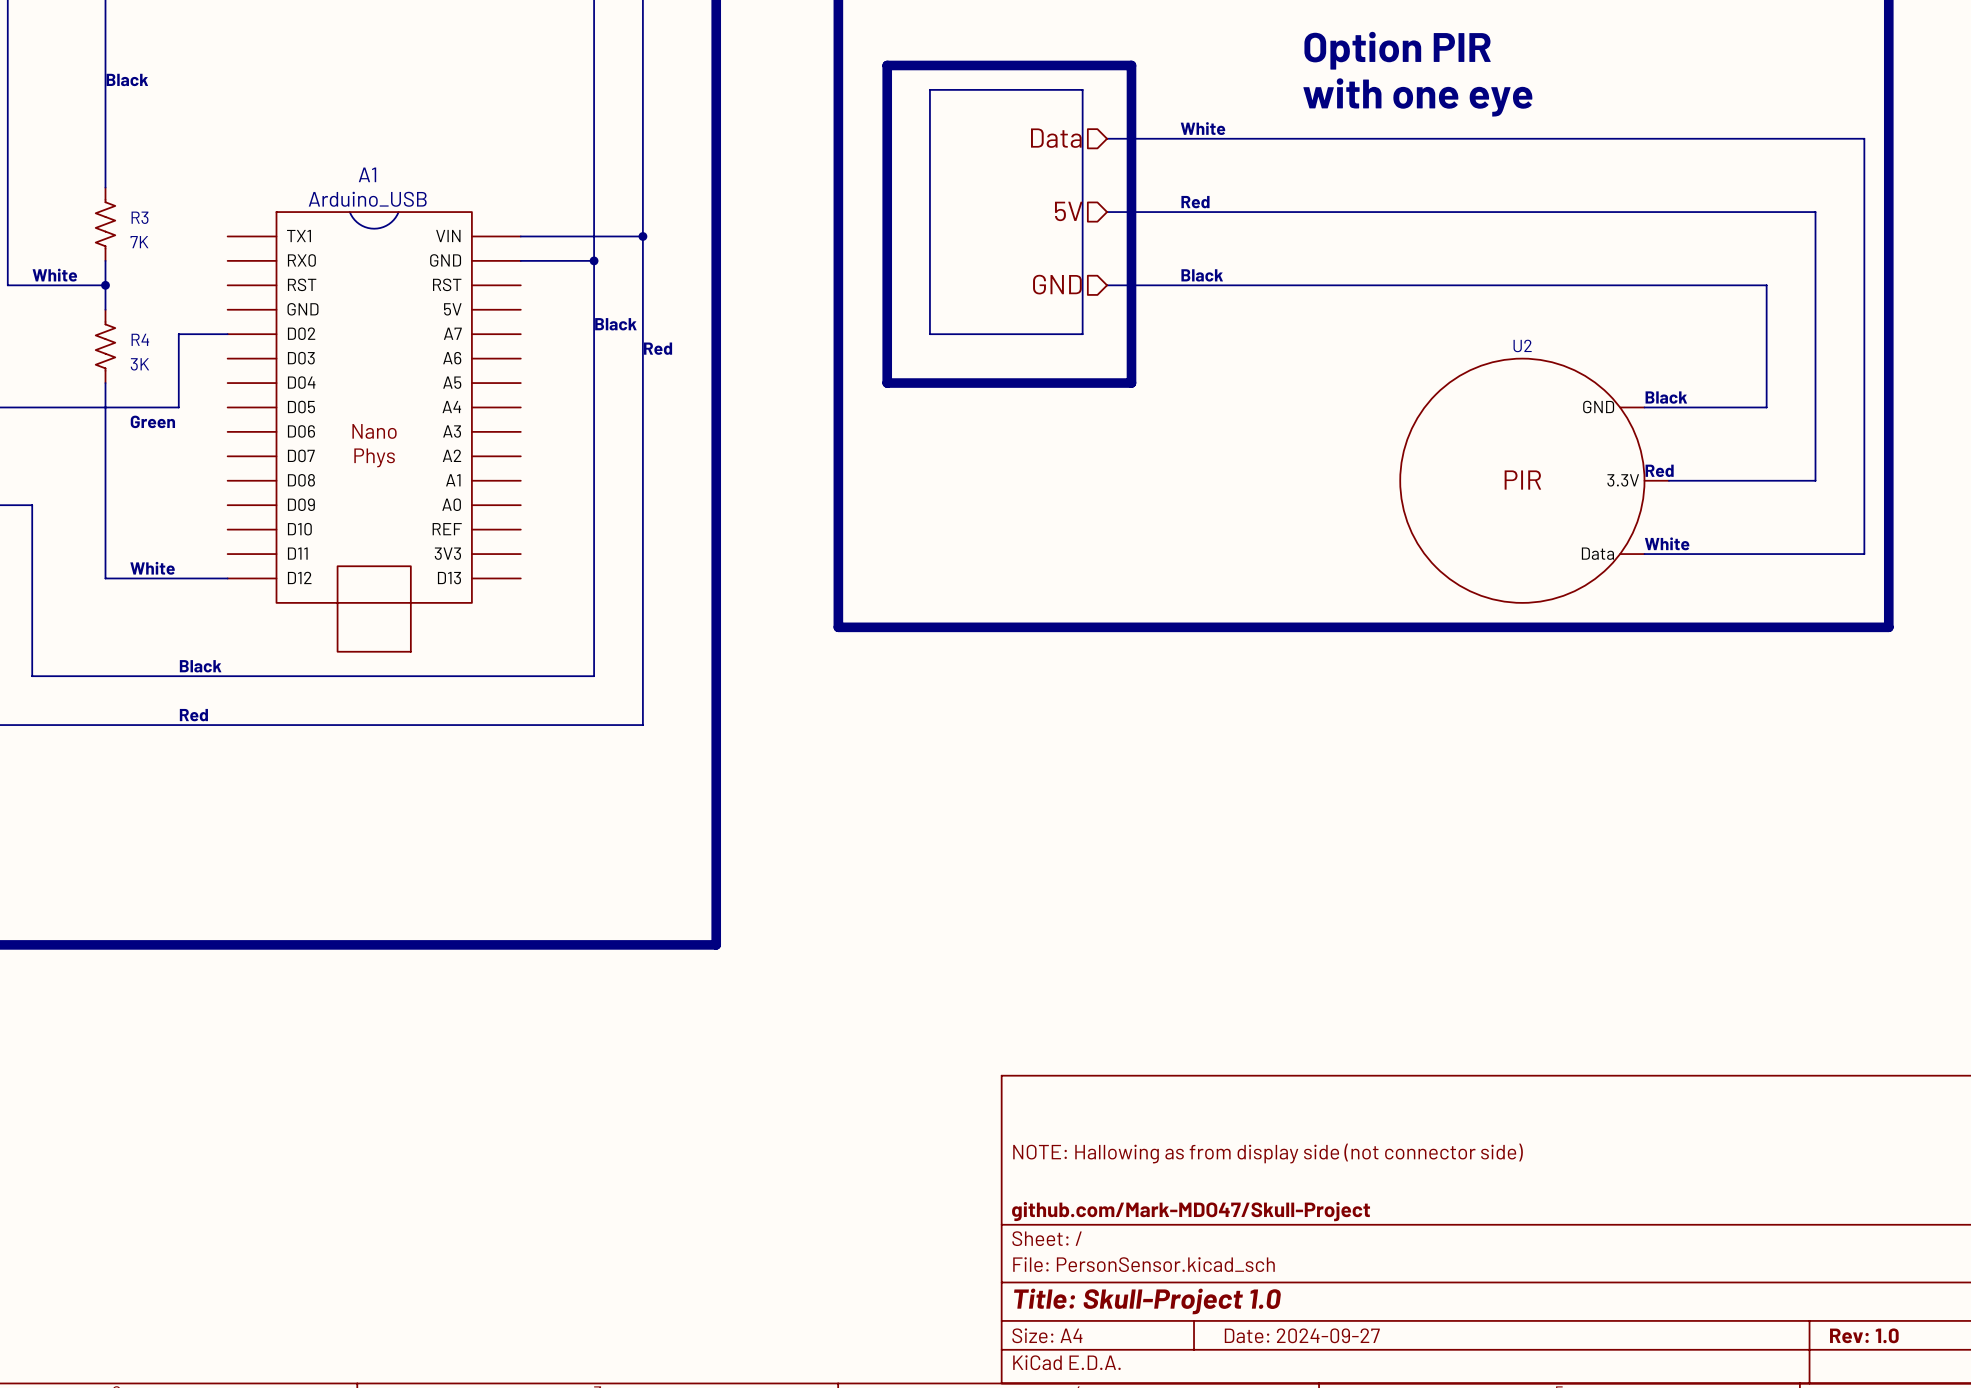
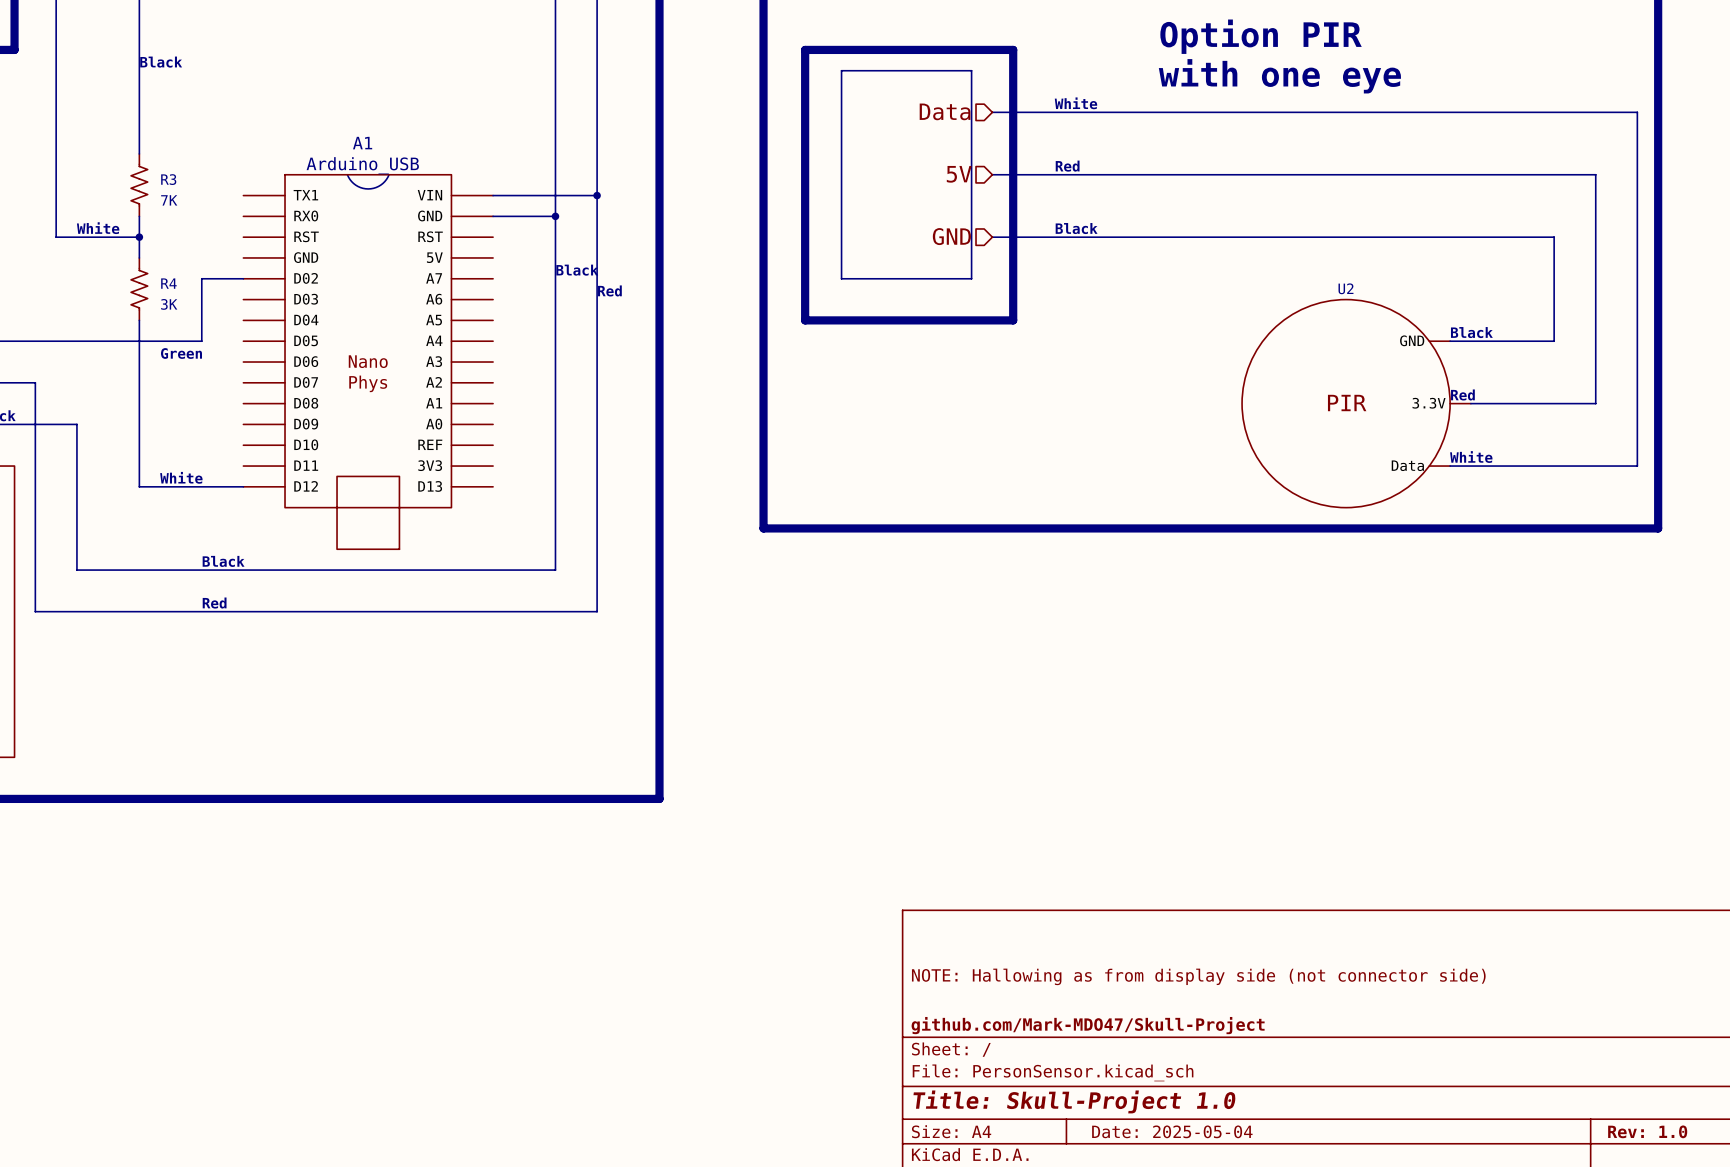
title block: Date: 2024-09-27 (1302, 1335) -> Date: 2025-05-04 (1172, 1131)

